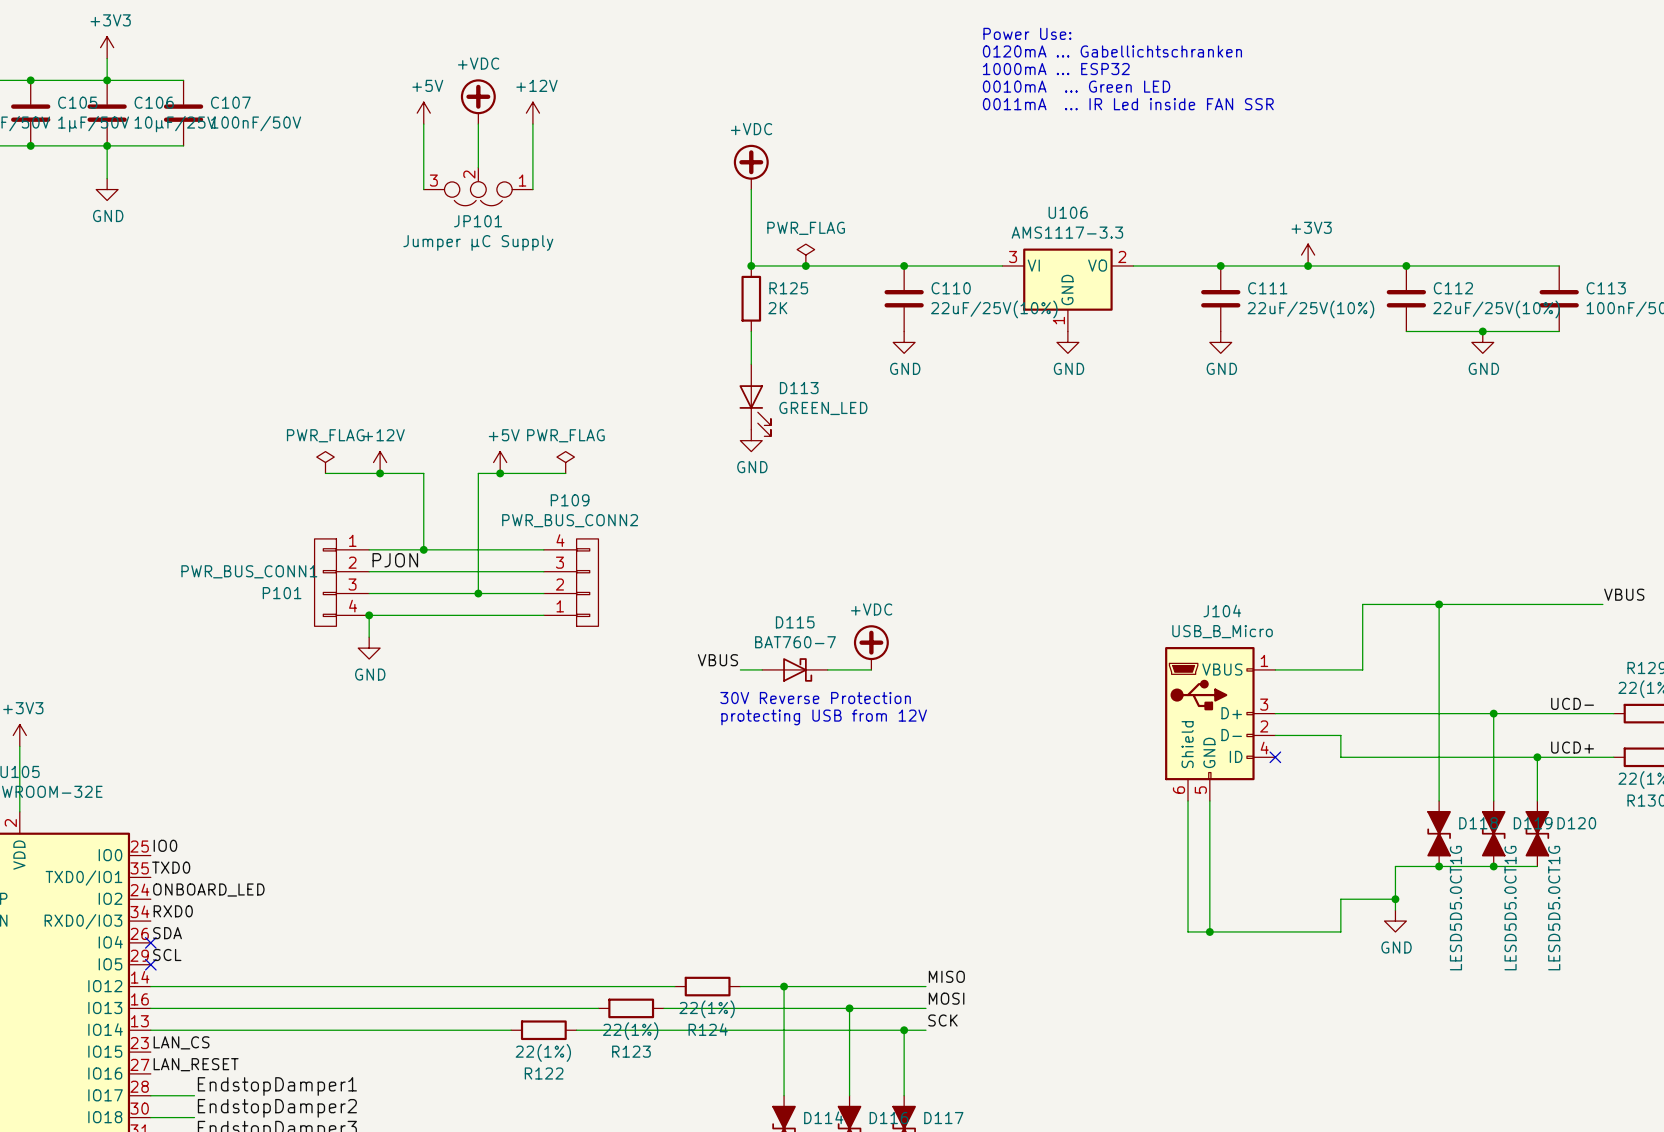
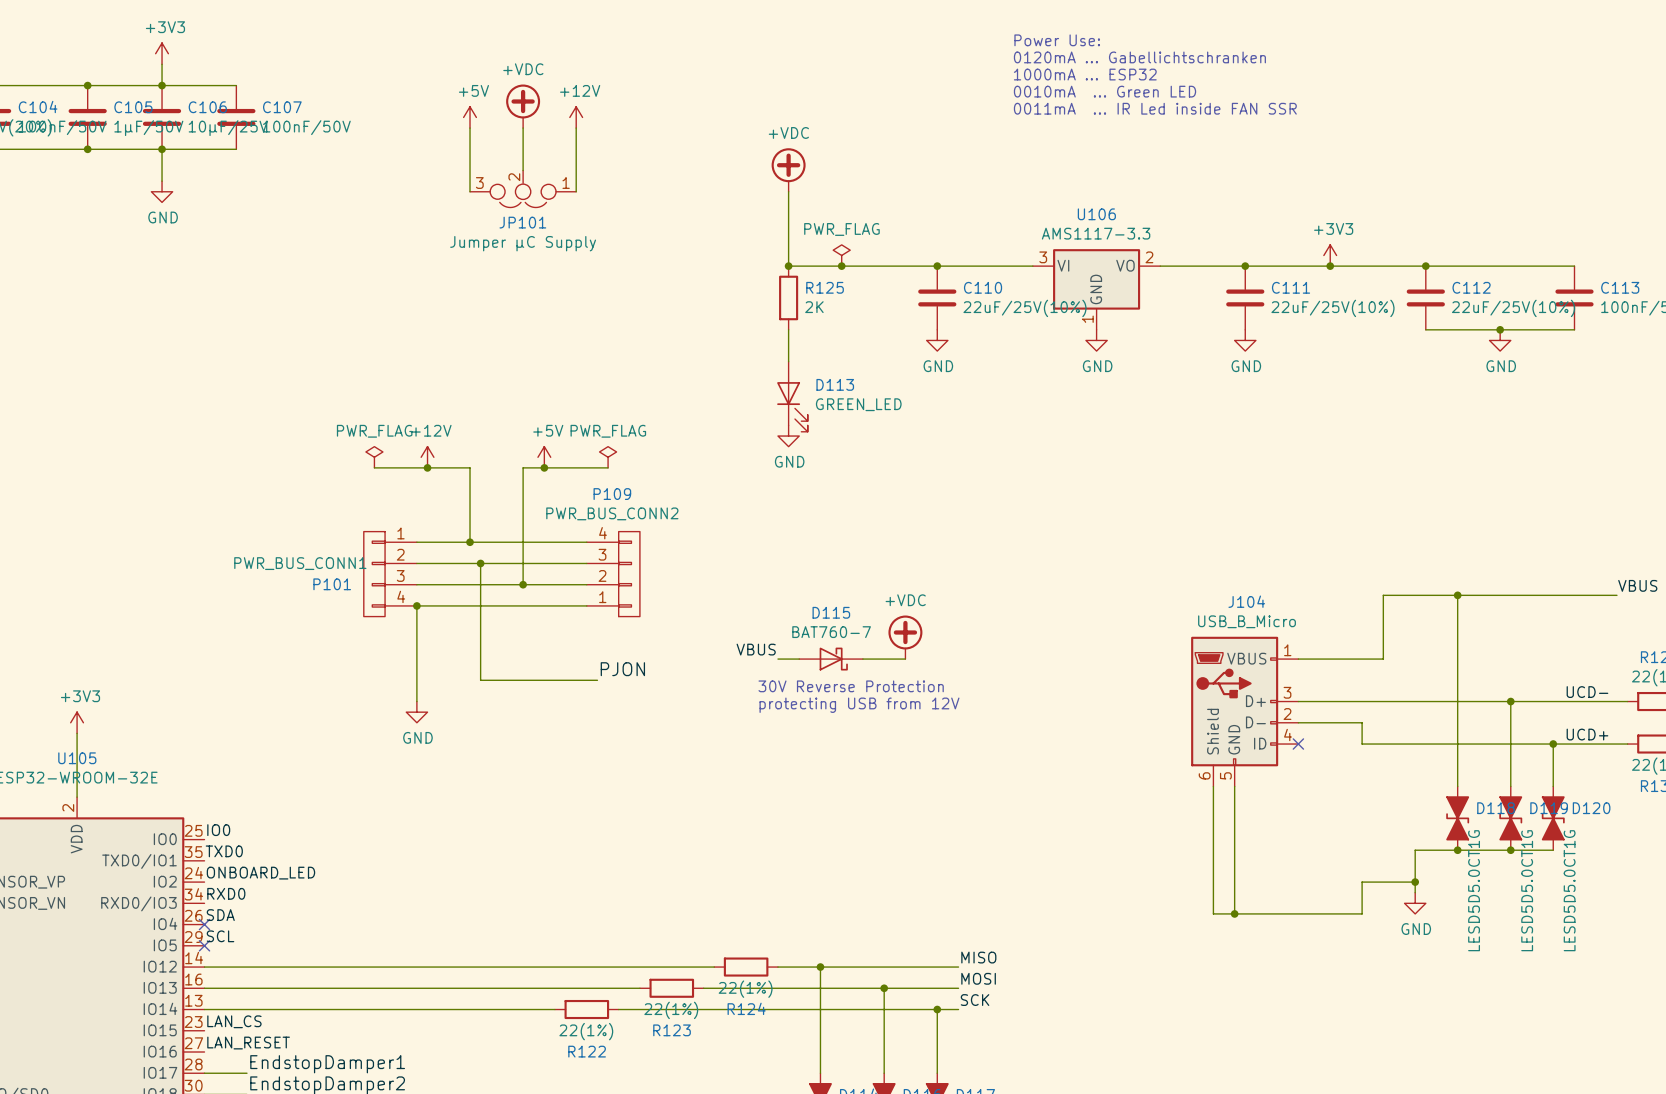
label: PJON (395, 560) -> none
wire: none -> (480, 563) (480, 680) (597, 680)
junction: none -> (480, 563)
wire: none -> (416, 627) (416, 701)
power symbol position: GND (369, 648) -> GND (416, 712)
label: none -> PJON (622, 669)

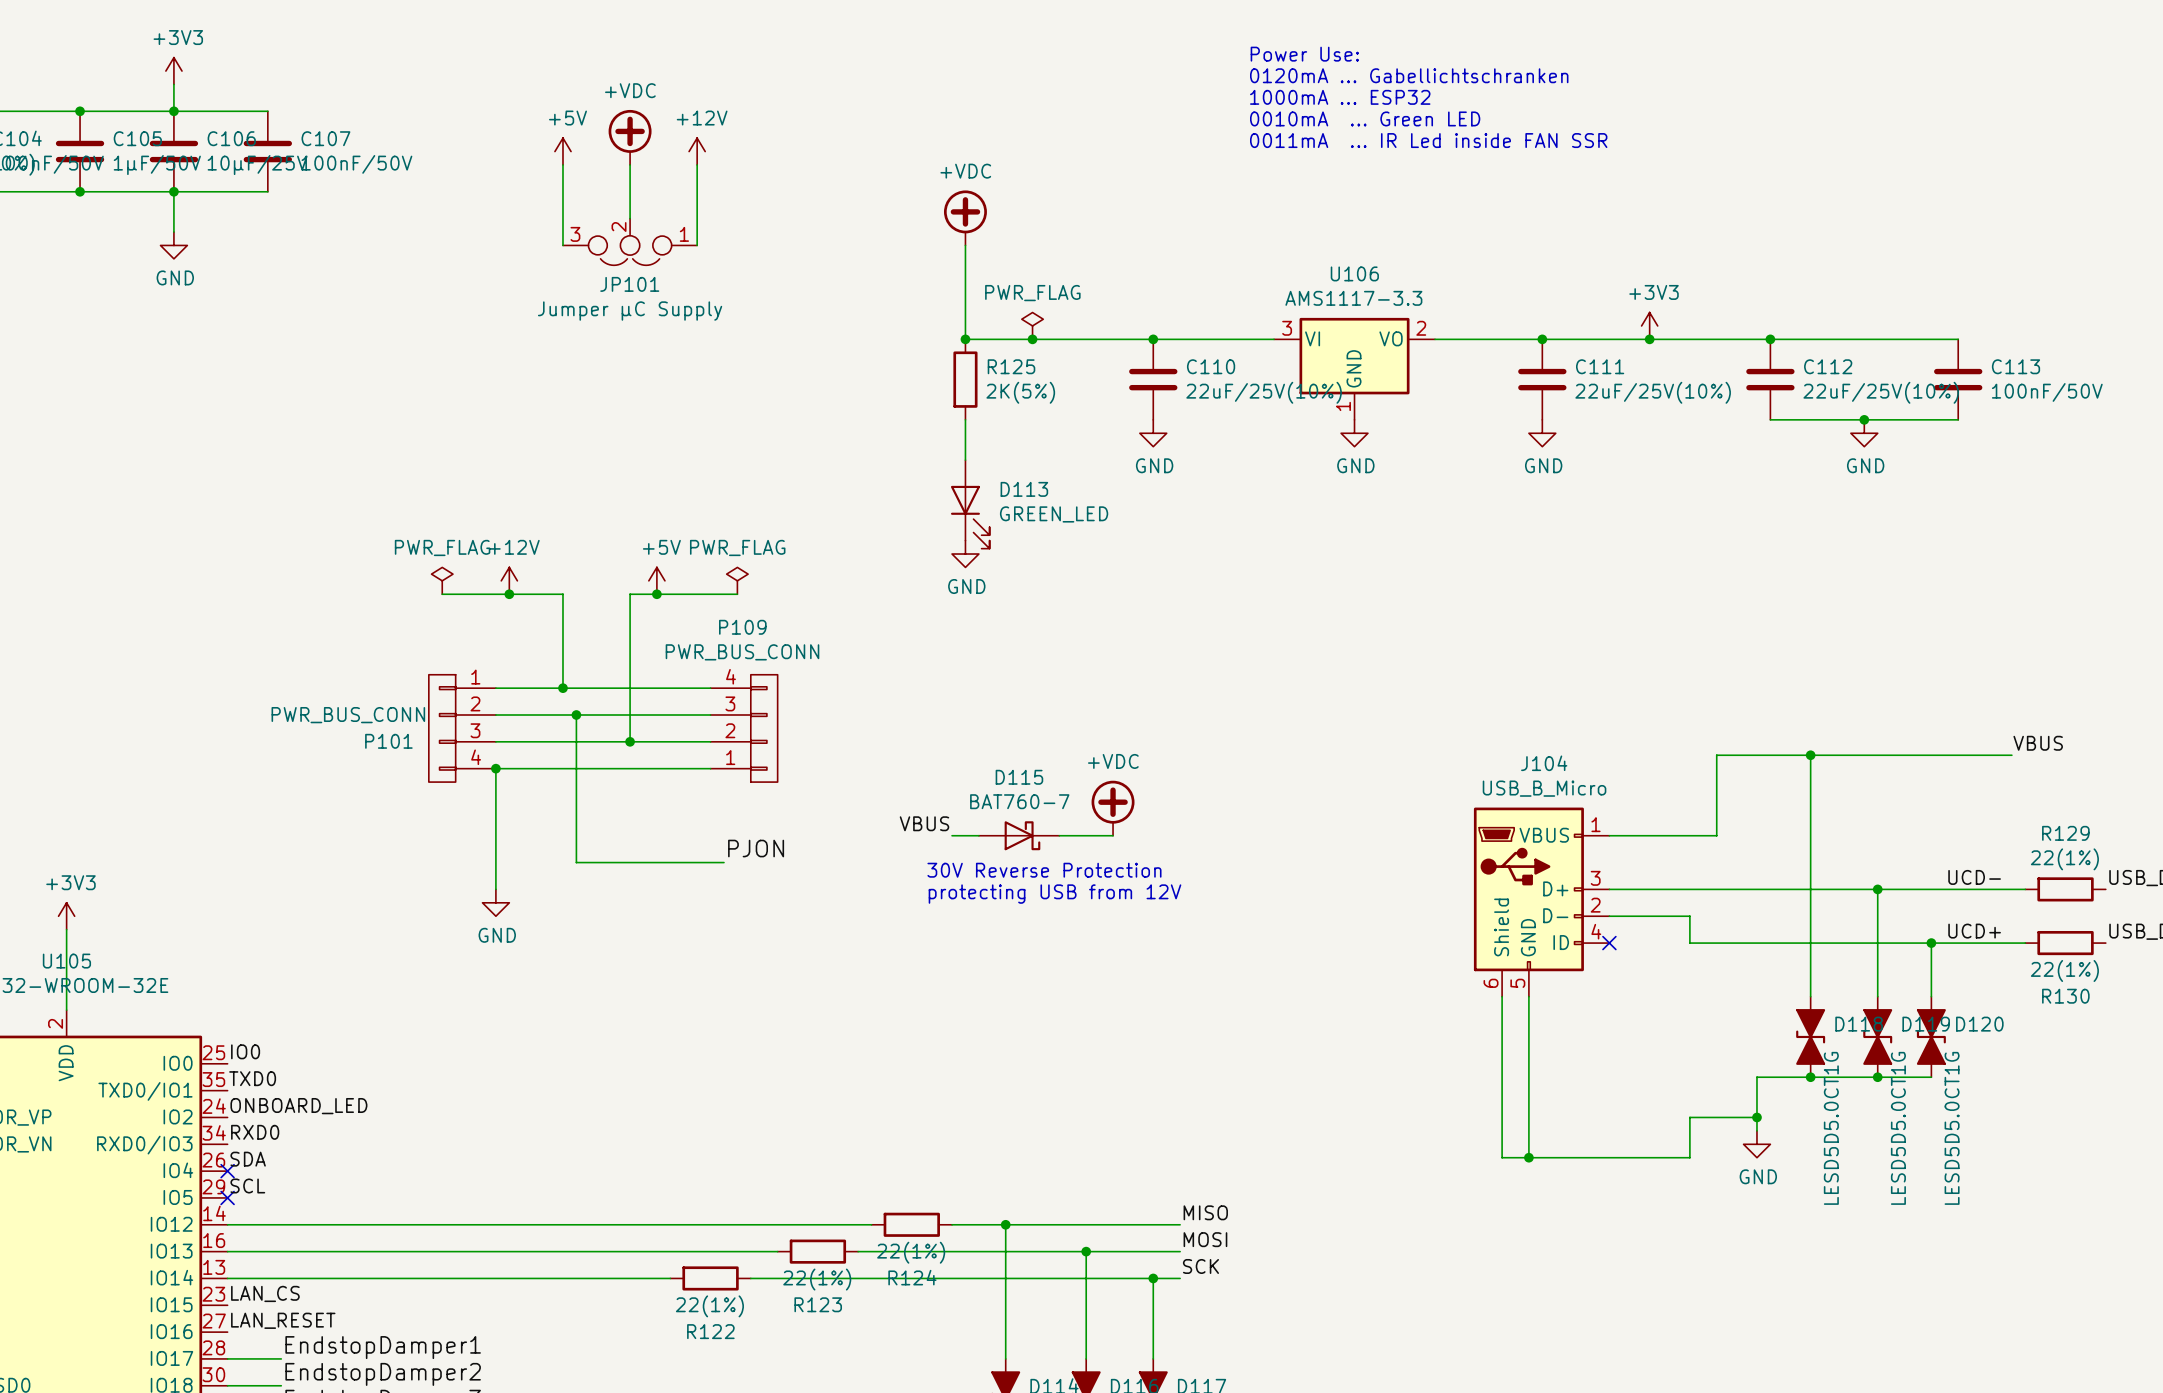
R125 value: 2K (814, 307) -> 2K(5%) (1020, 392)
P109 value: PWR_BUS_CONN2 (612, 513) -> PWR_BUS_CONN (742, 652)
P101 value: PWR_BUS_CONN1 (300, 563) -> PWR_BUS_CONN (348, 715)

